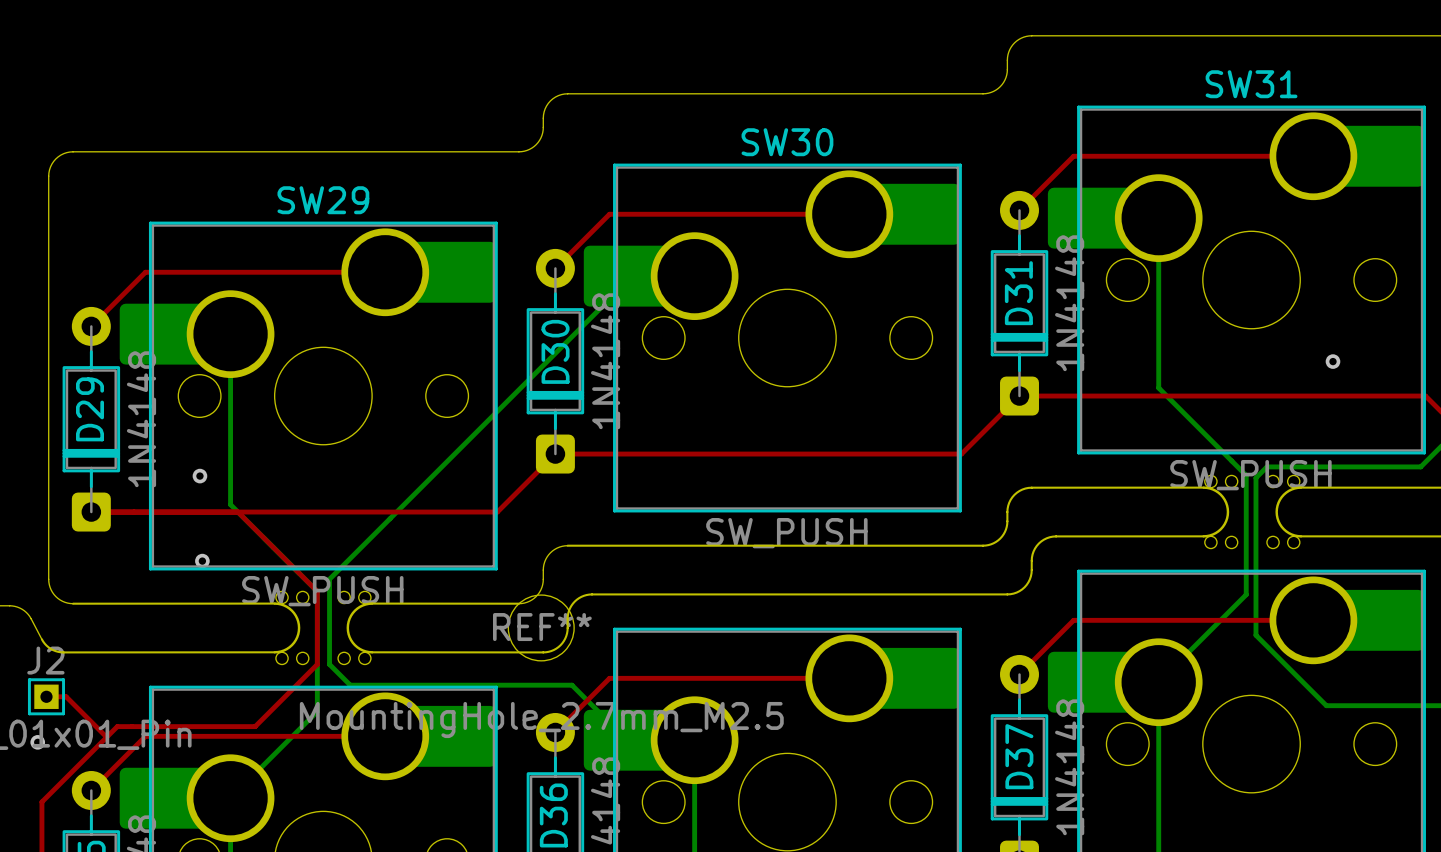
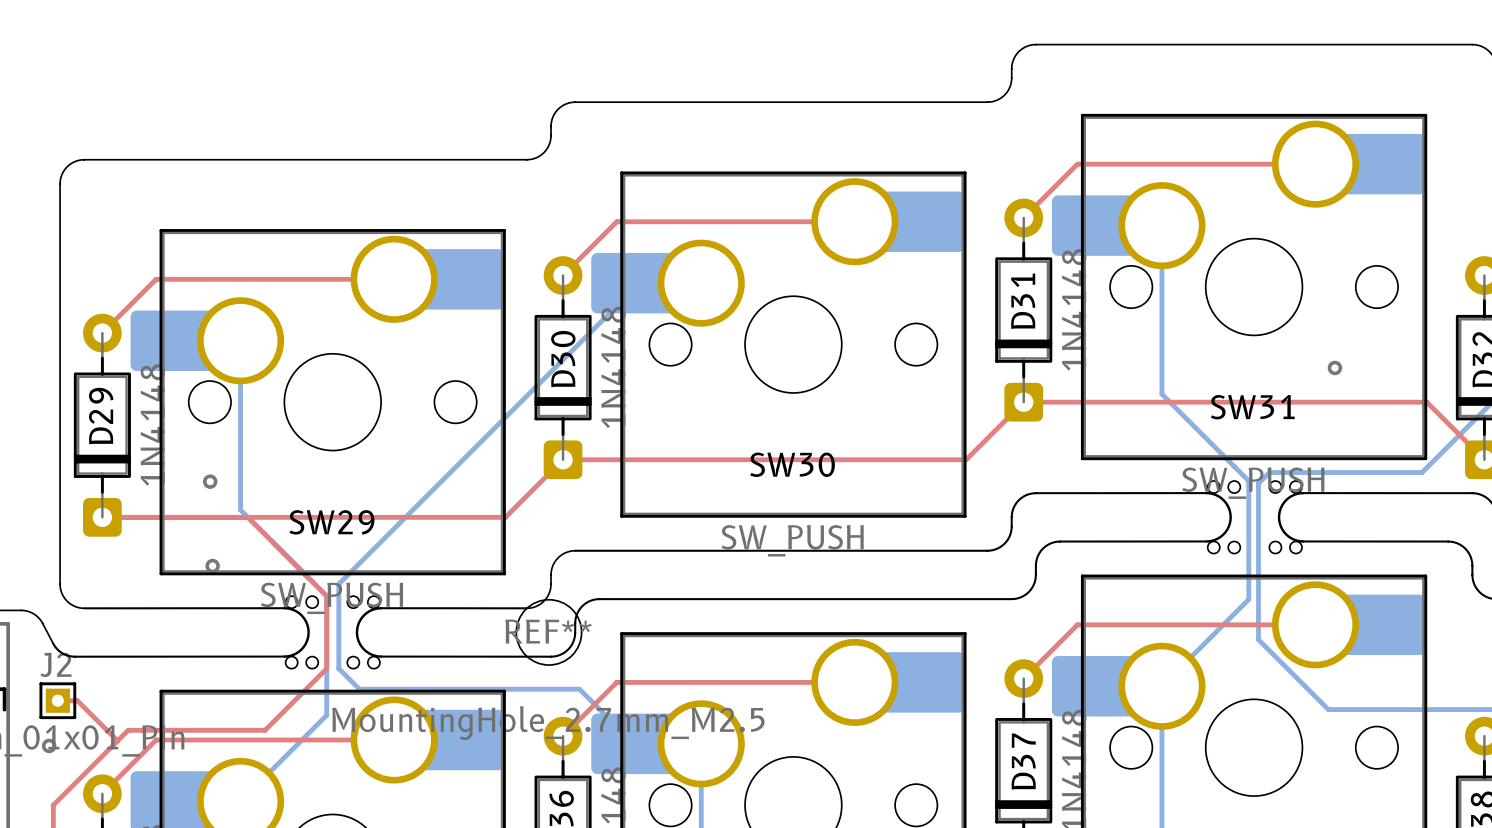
SW31 name position: SW31 (1251, 84) -> SW31 (1252, 407)
SW30 name position: SW30 (787, 142) -> SW30 (792, 464)
SW29 name position: SW29 (323, 200) -> SW29 (331, 522)

